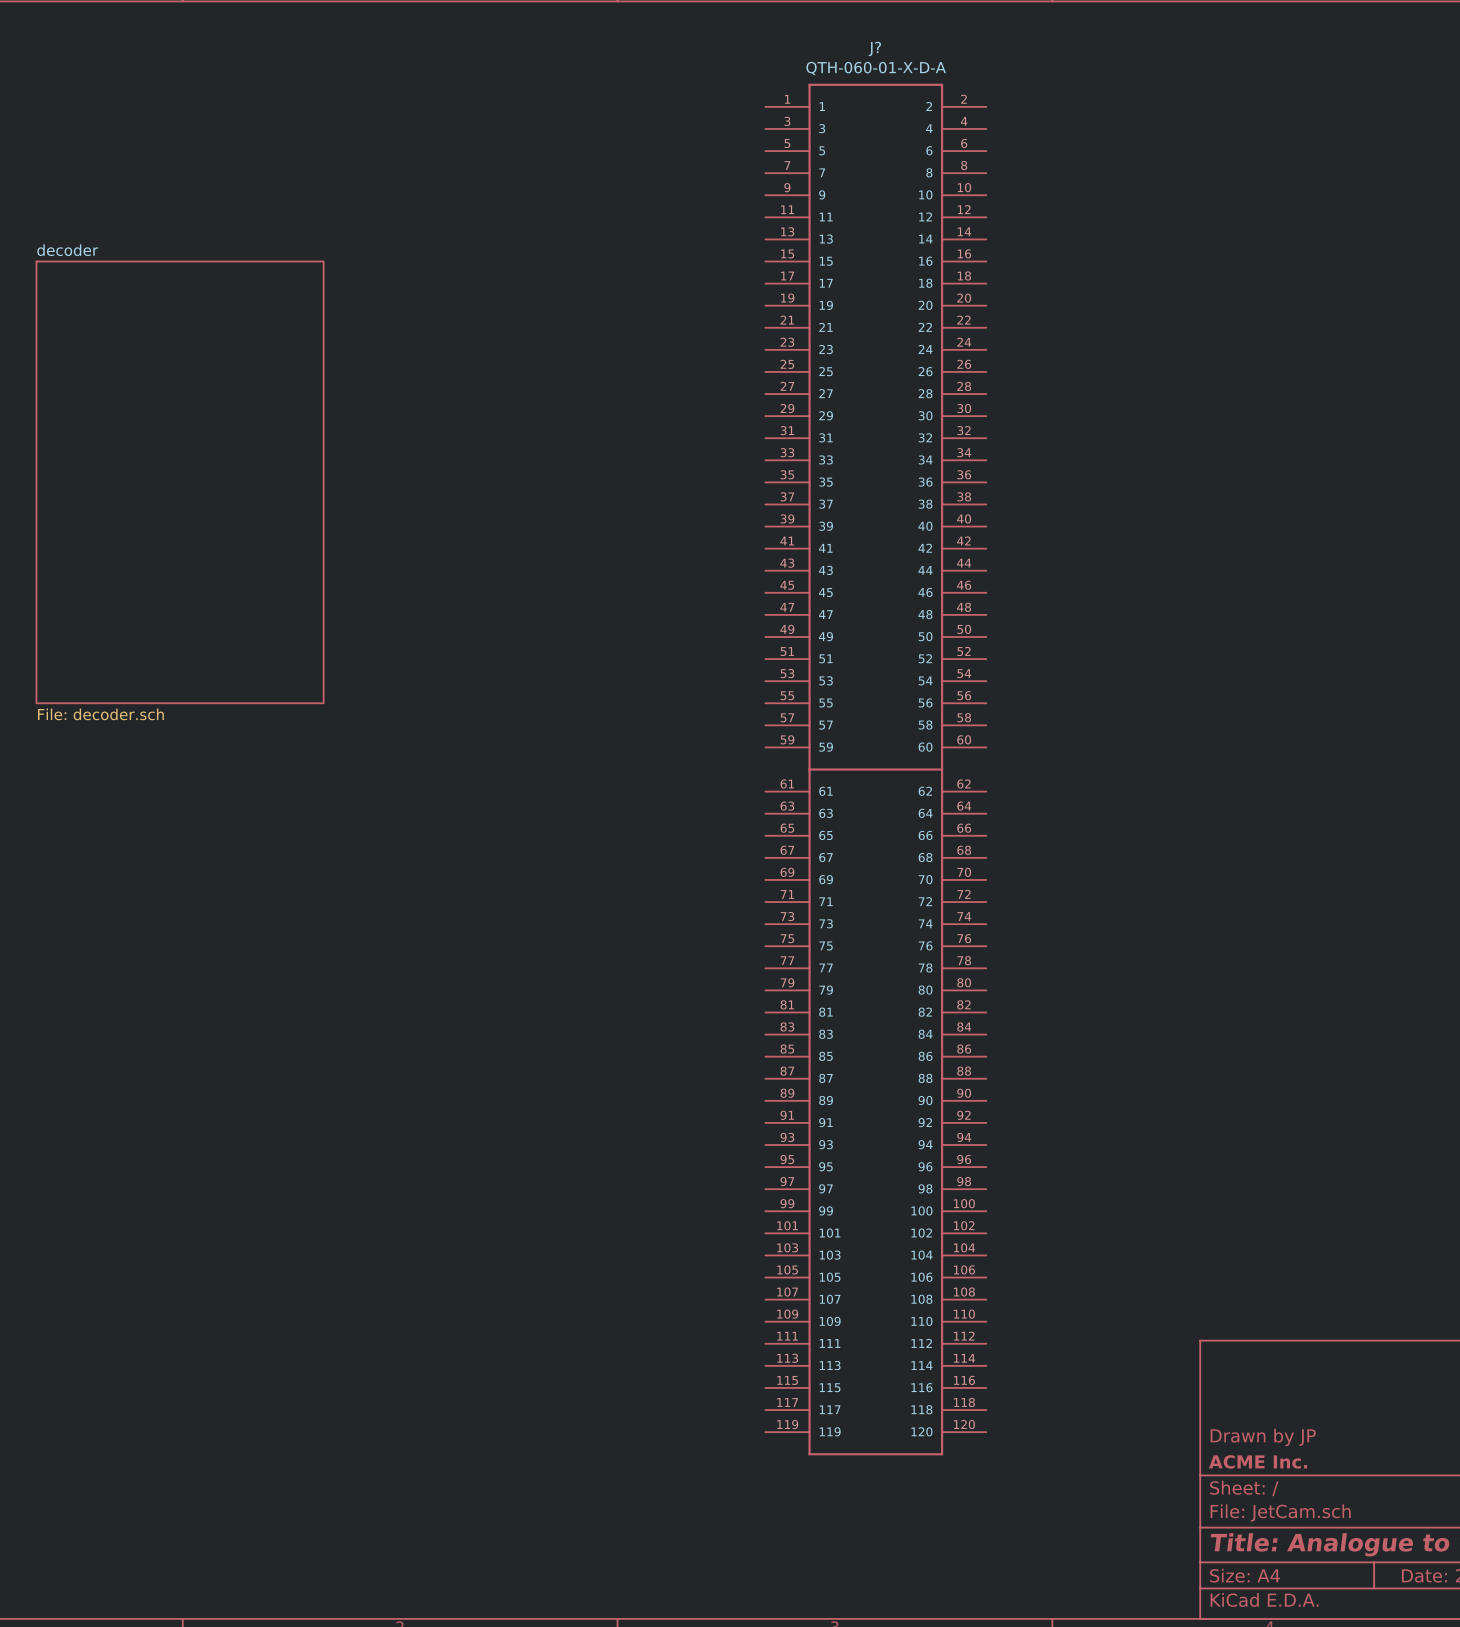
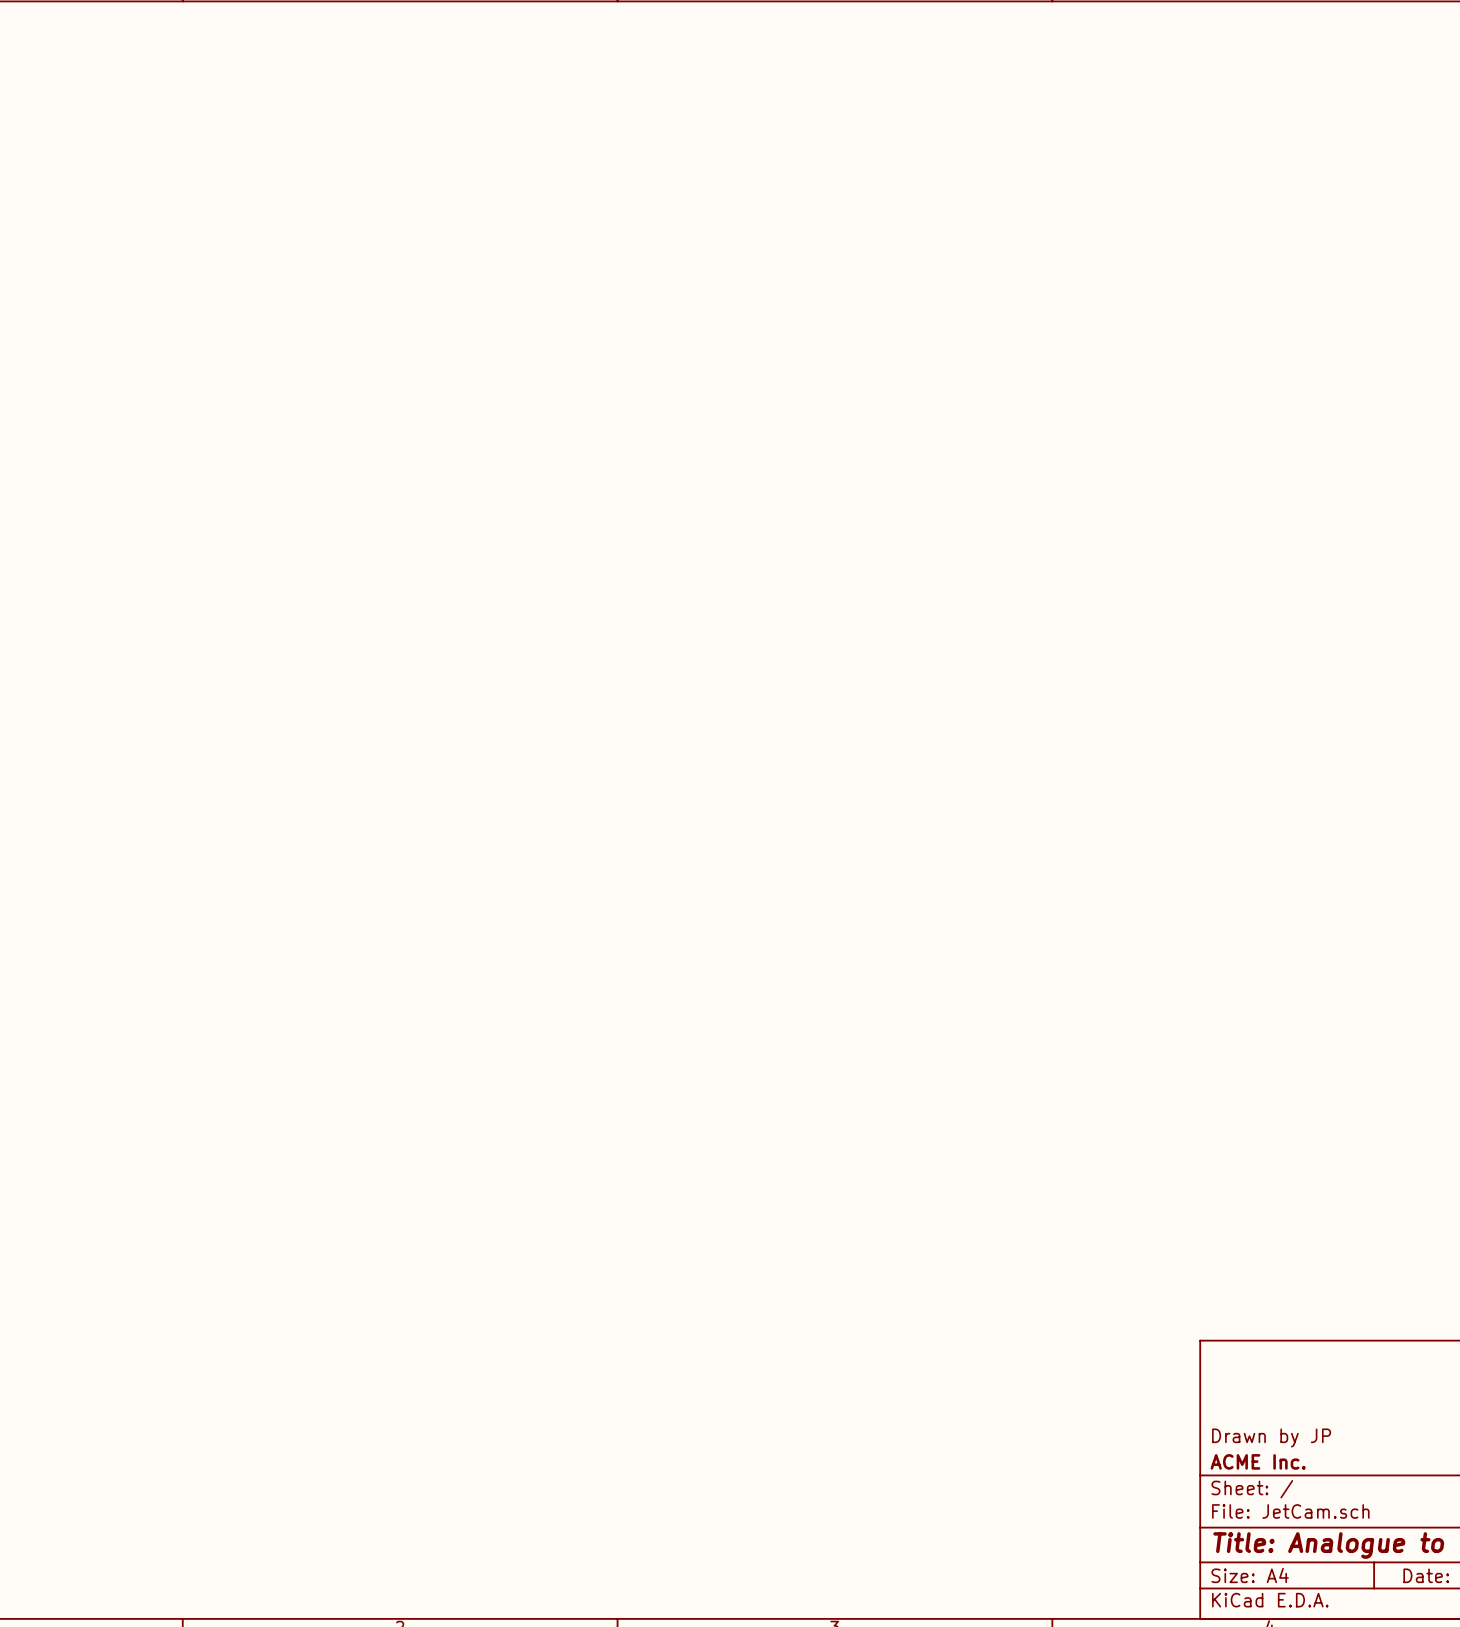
sheet decoder: File: decoder.sch (180, 482) -> none
J?: QTH-060-01-X-D-A (875, 769) -> none

